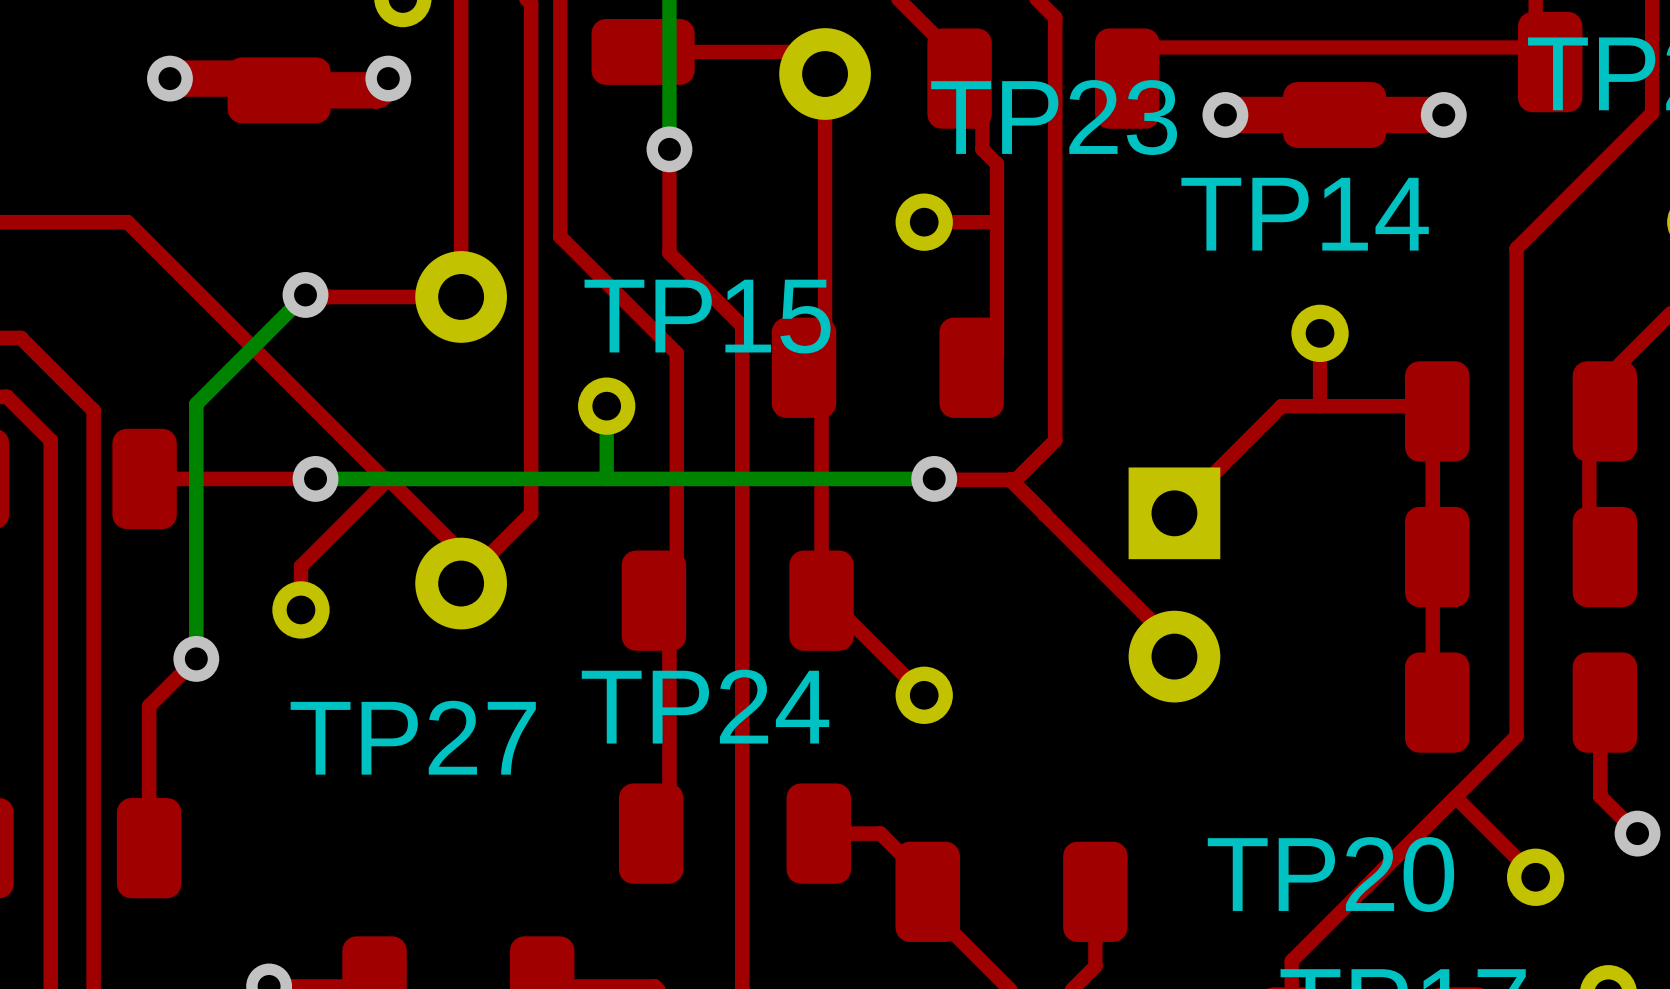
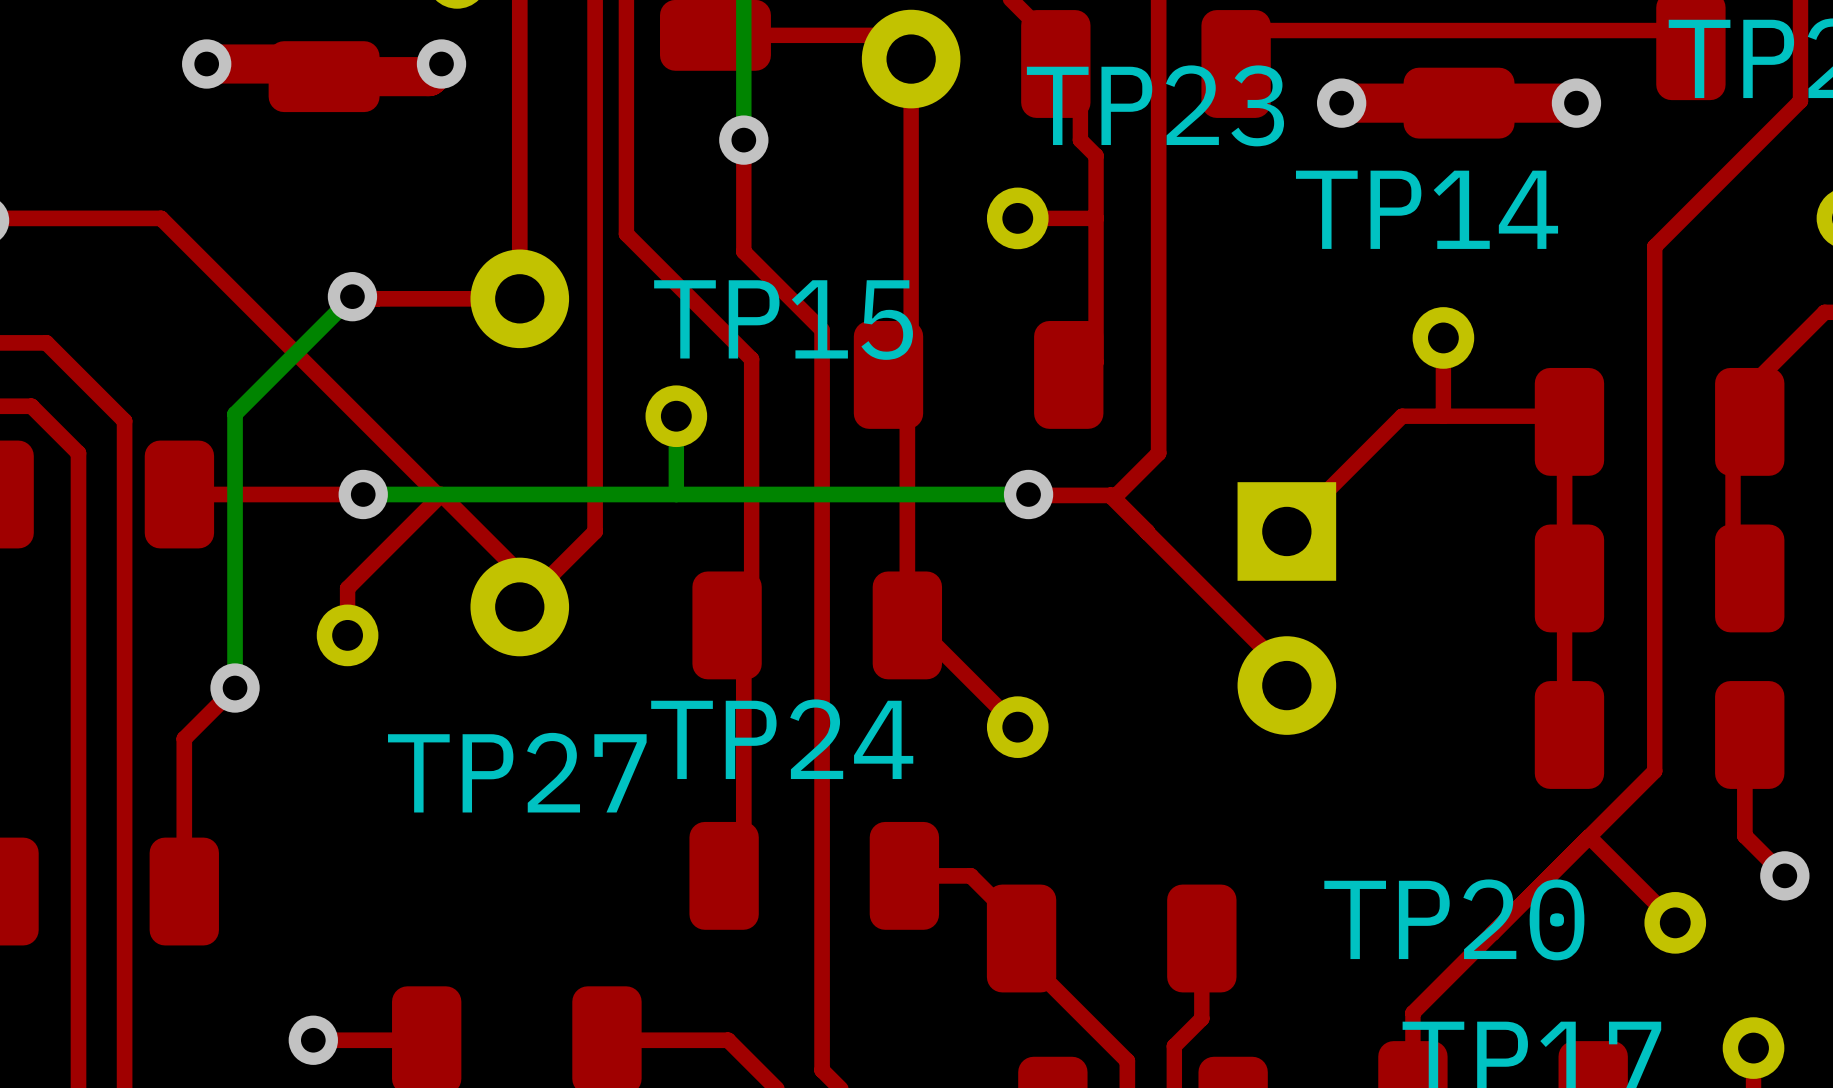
TP27 name position: TP27 (413, 737) -> TP27 (517, 772)

